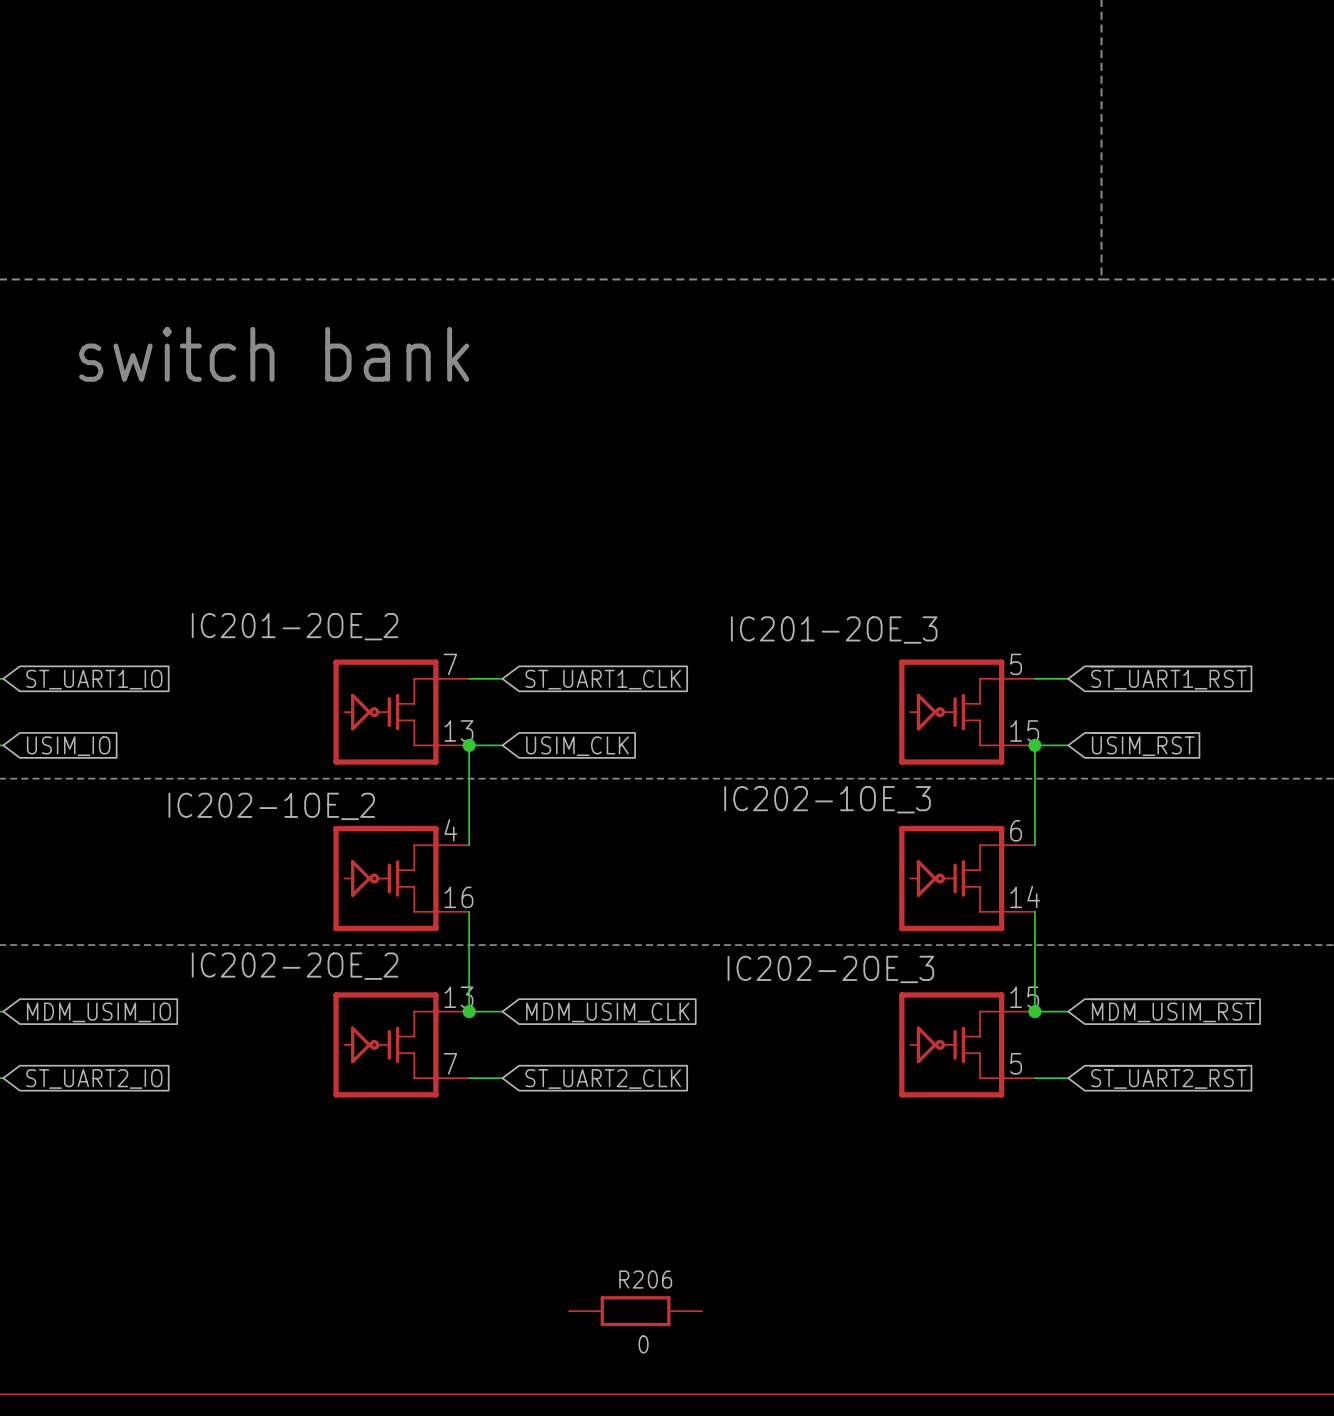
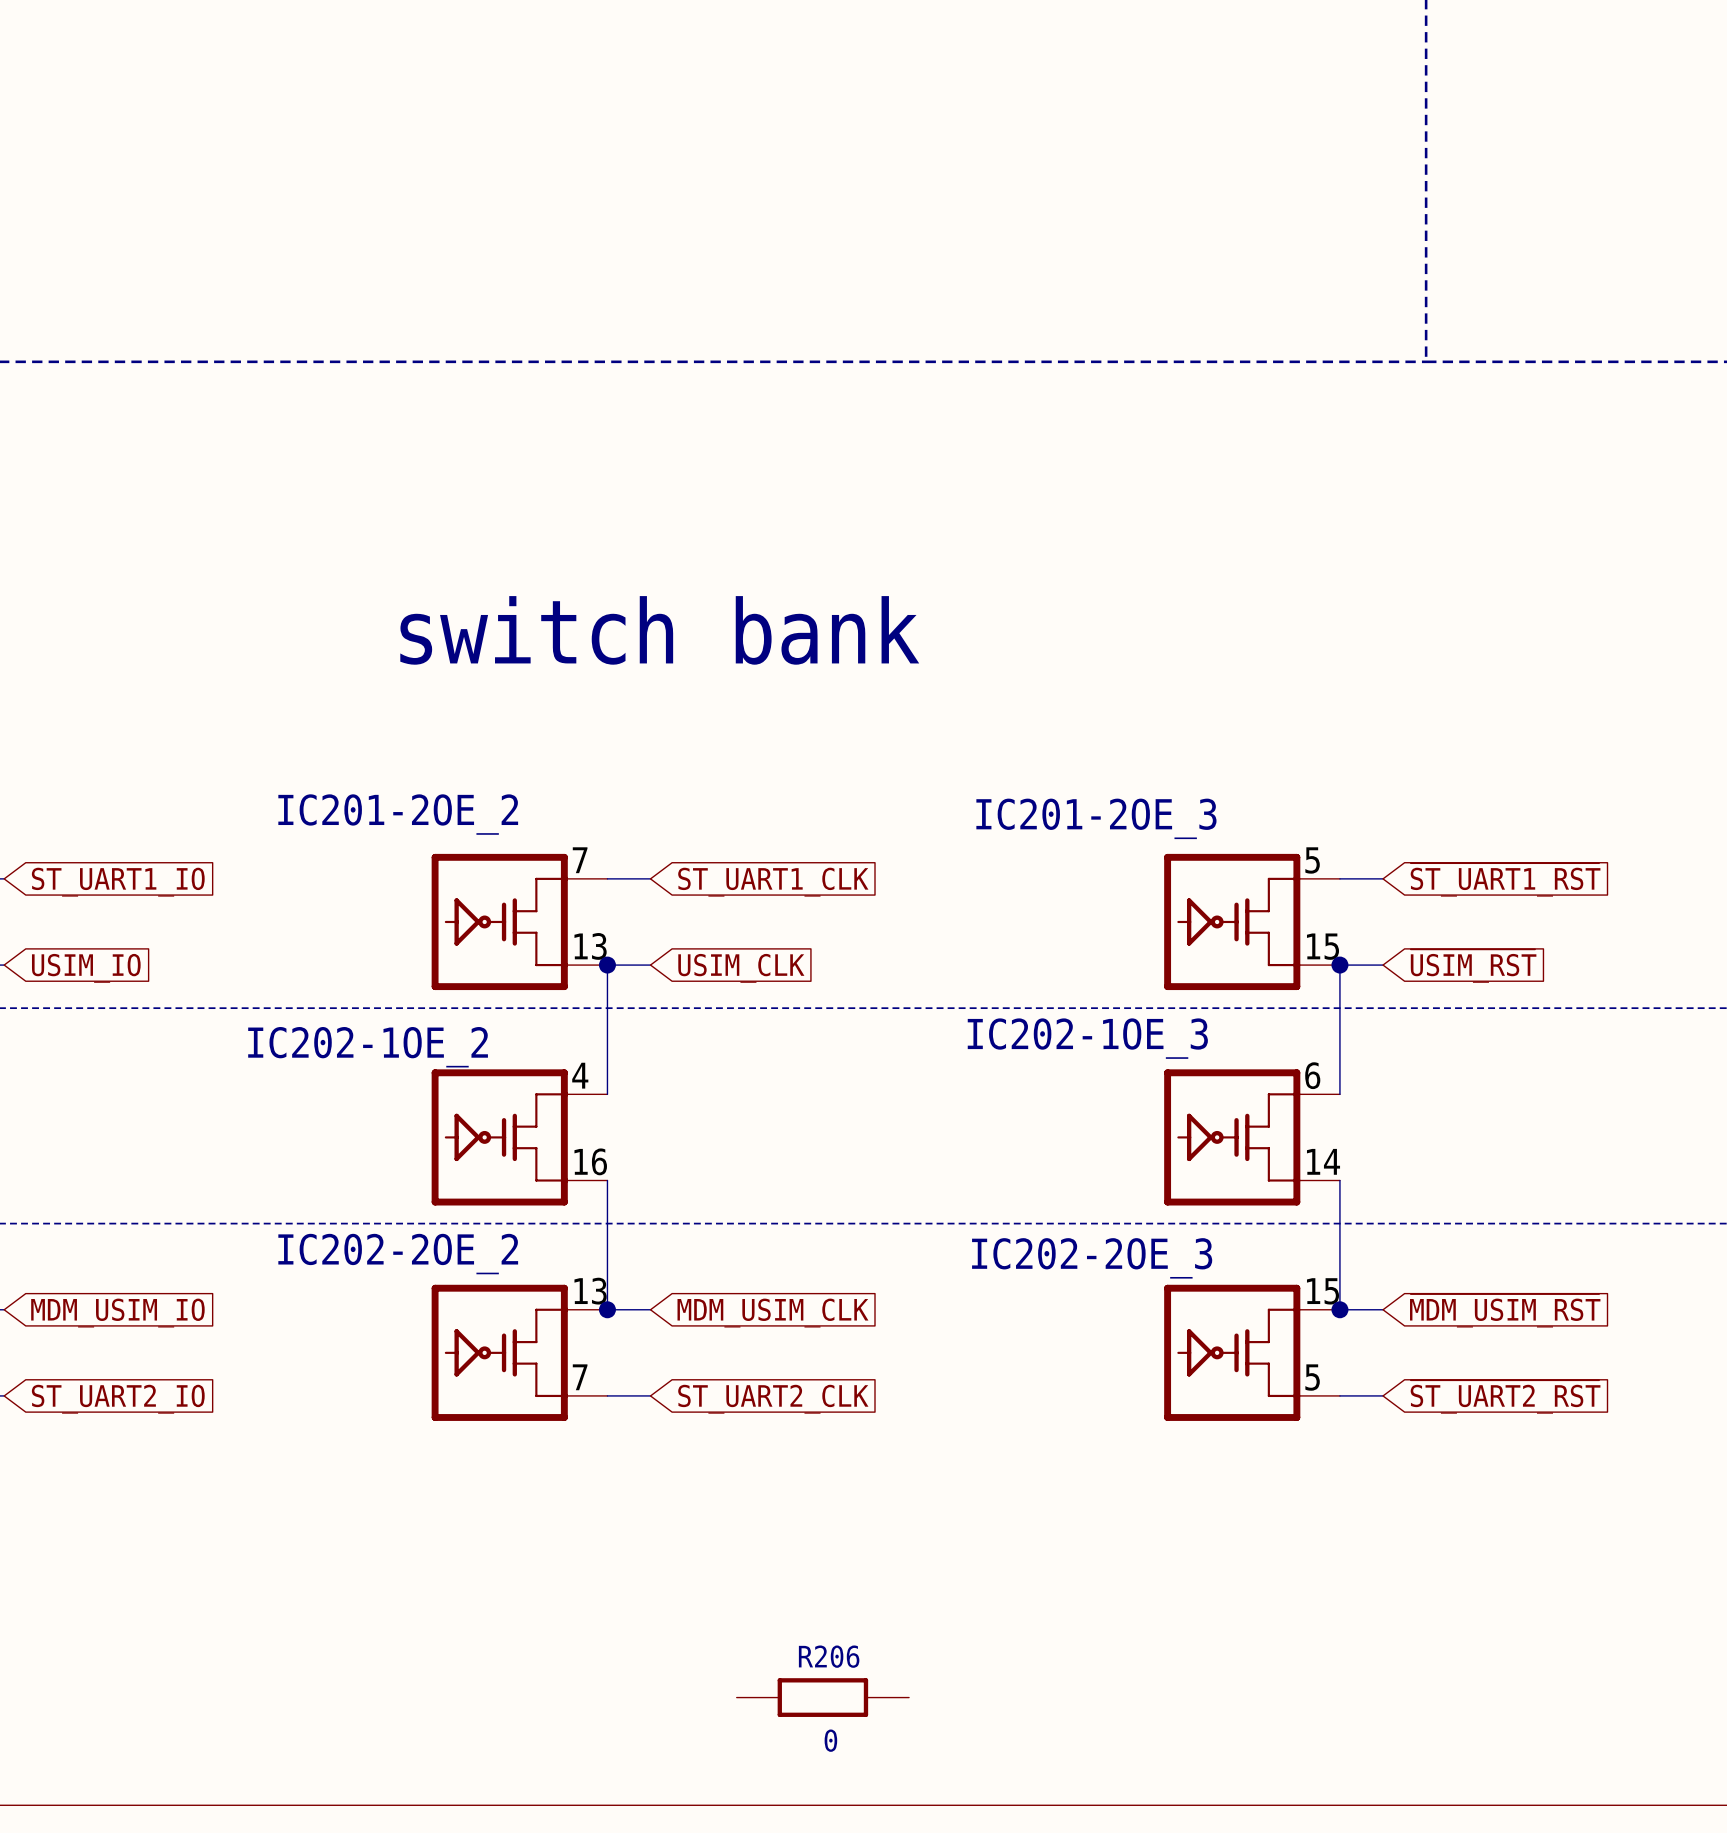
text position: switch bank (274, 354) -> switch bank (659, 630)

